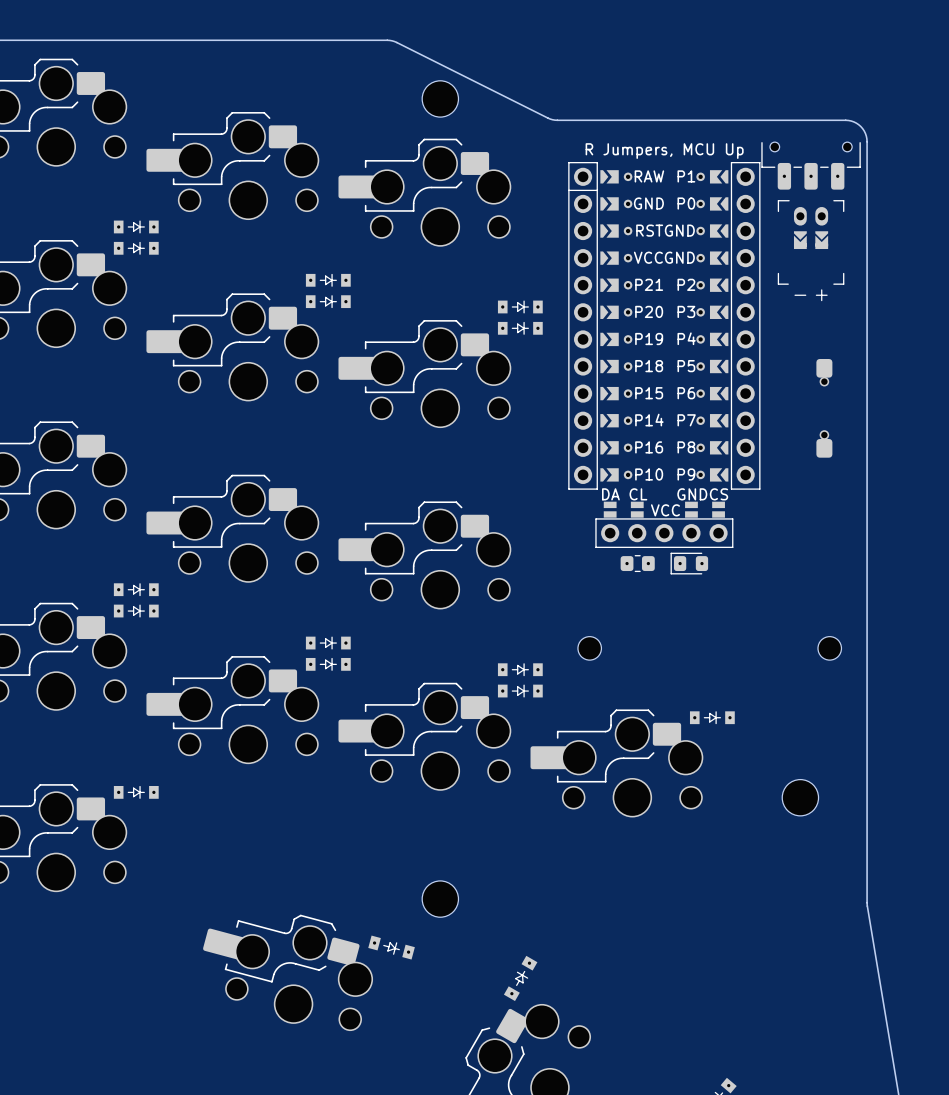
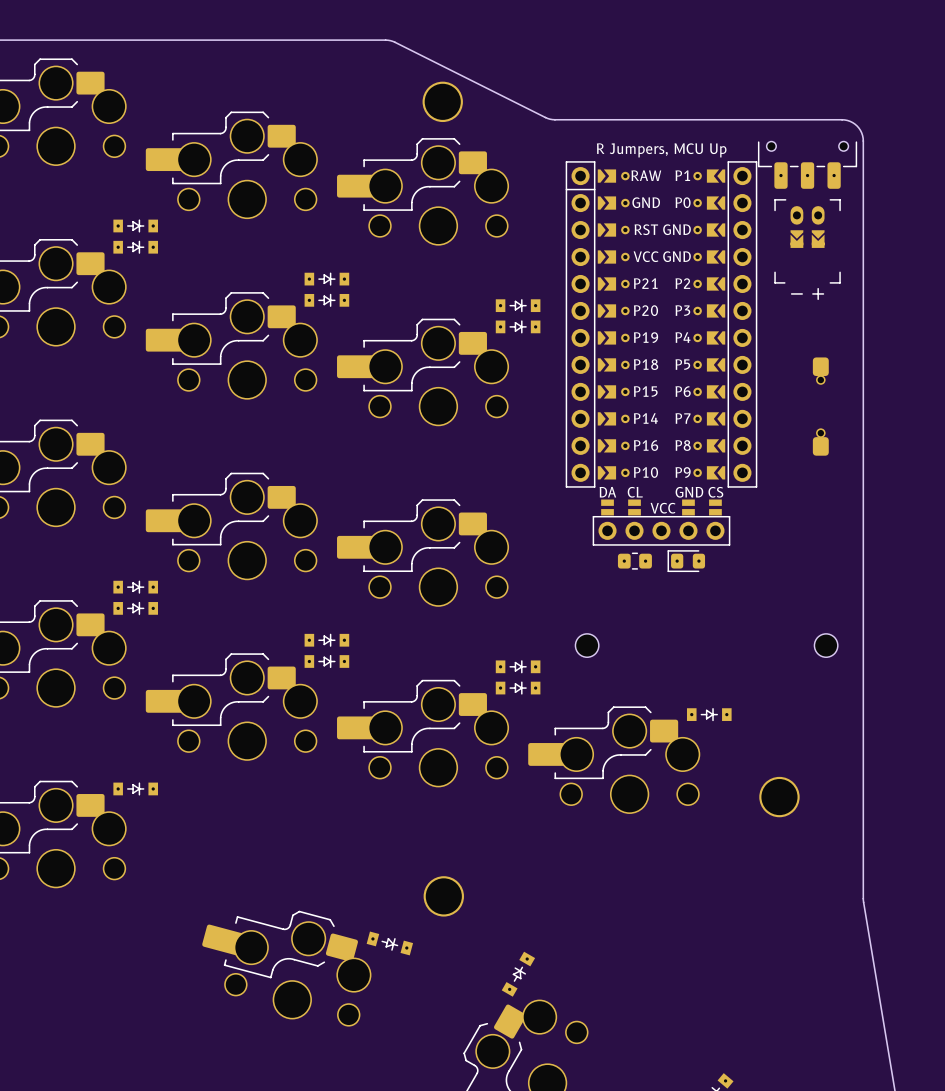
part footprint: [422, 80, 459, 118] -> [422, 81, 463, 123]
part: (800, 797) -> none
part: none -> (779, 797)
part footprint: [422, 880, 459, 918] -> [423, 876, 464, 917]

